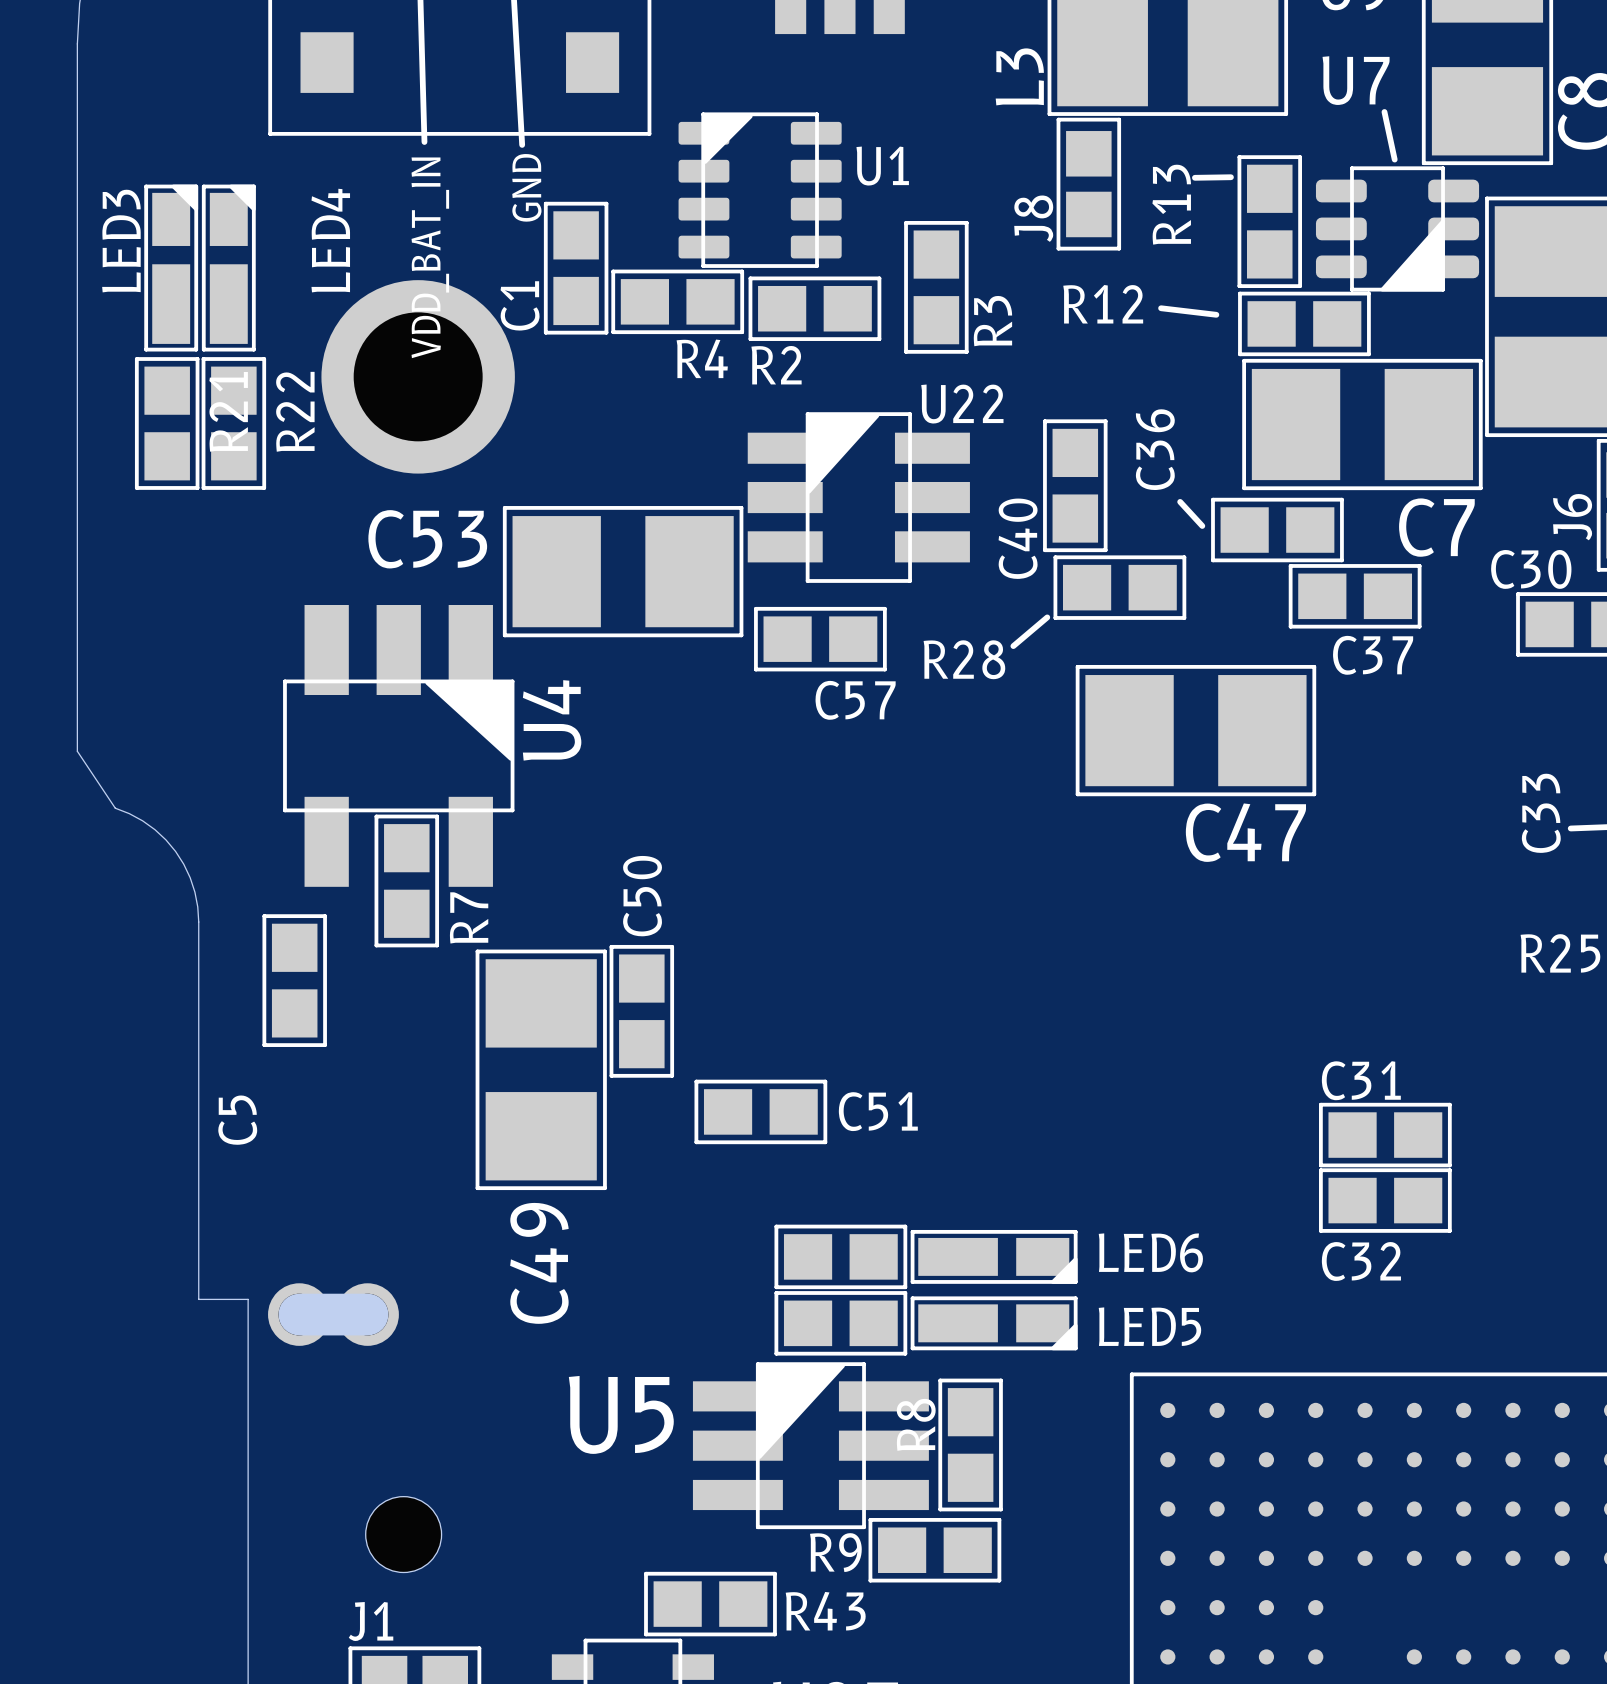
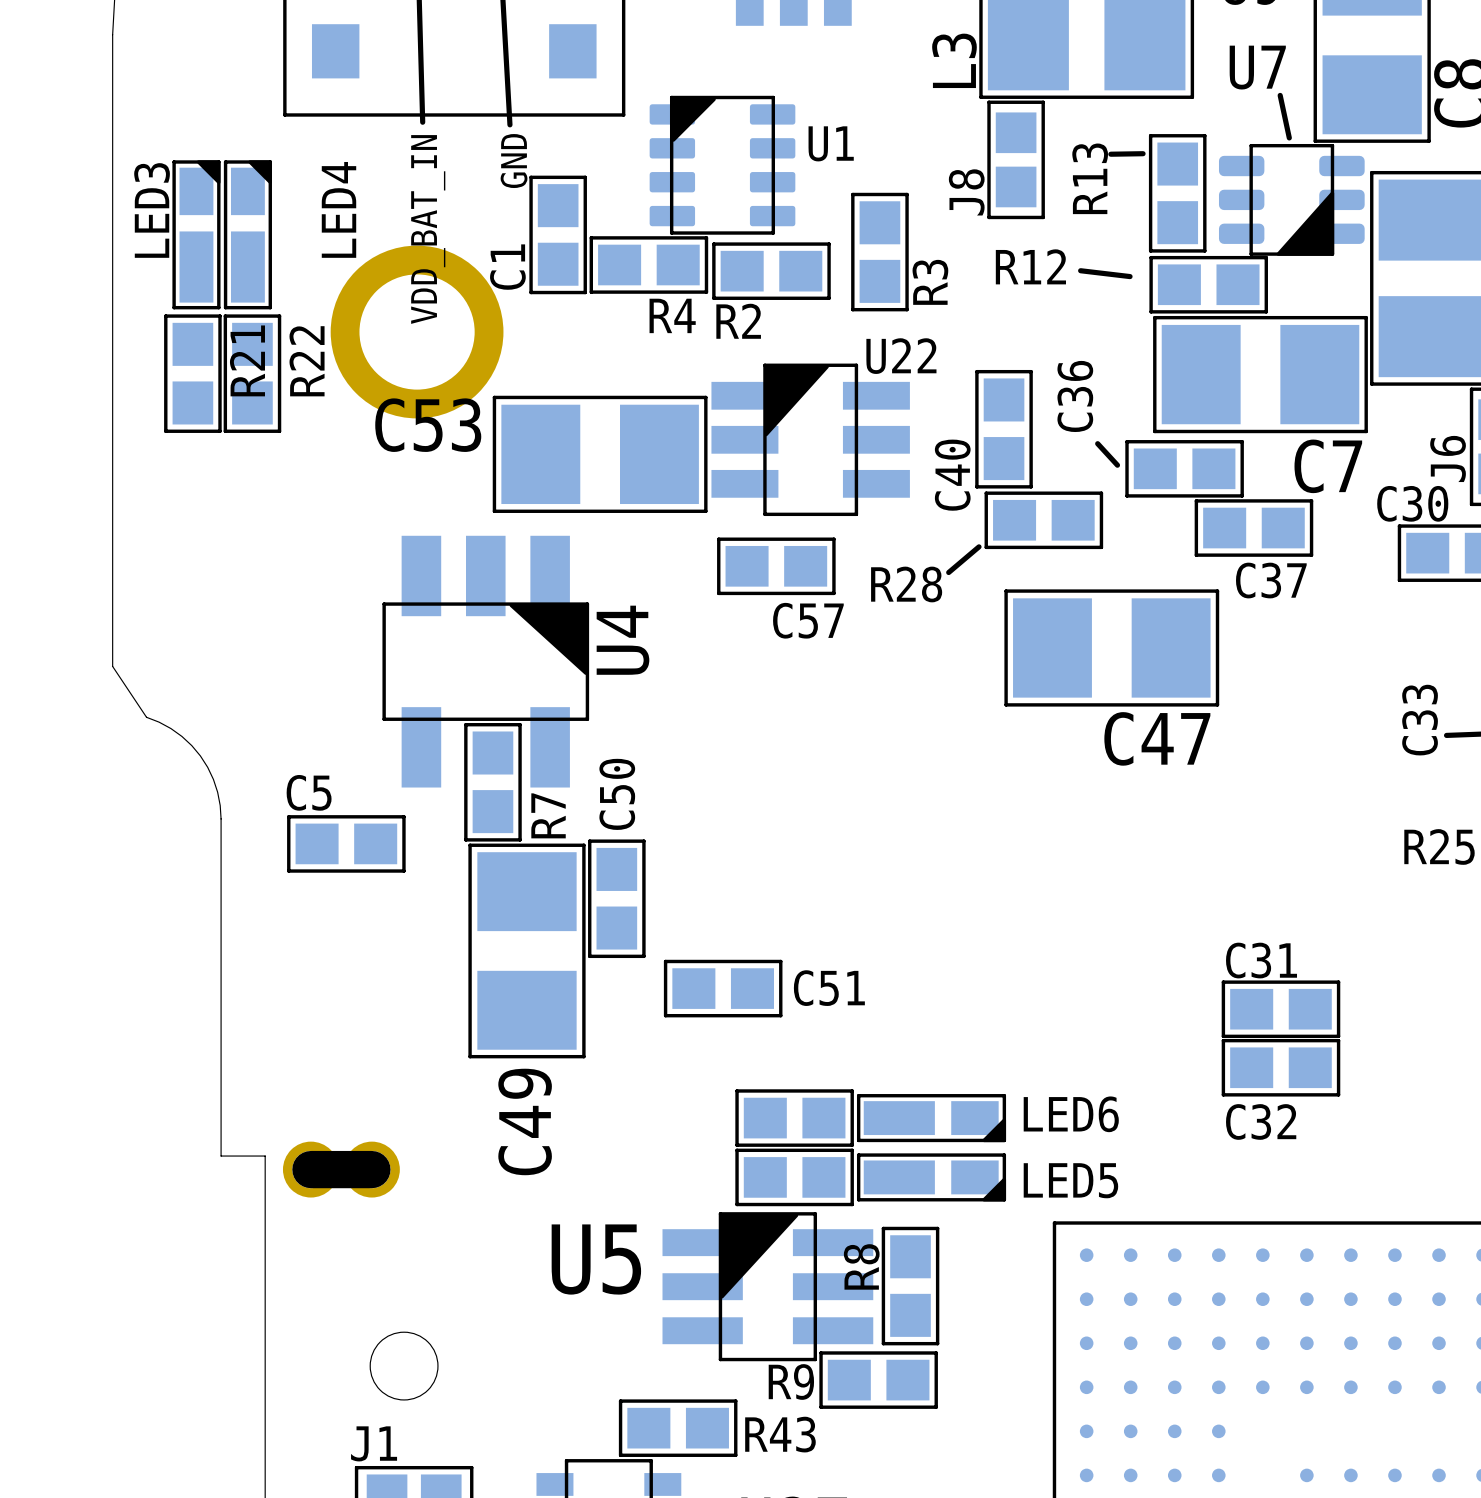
C53 position: (623, 571) -> (600, 454)
U4 position: (398, 745) -> (485, 661)
R7 position: (406, 880) -> (492, 782)
C5 rotation: 0° (294, 980) -> 90° clockwise (346, 843)

